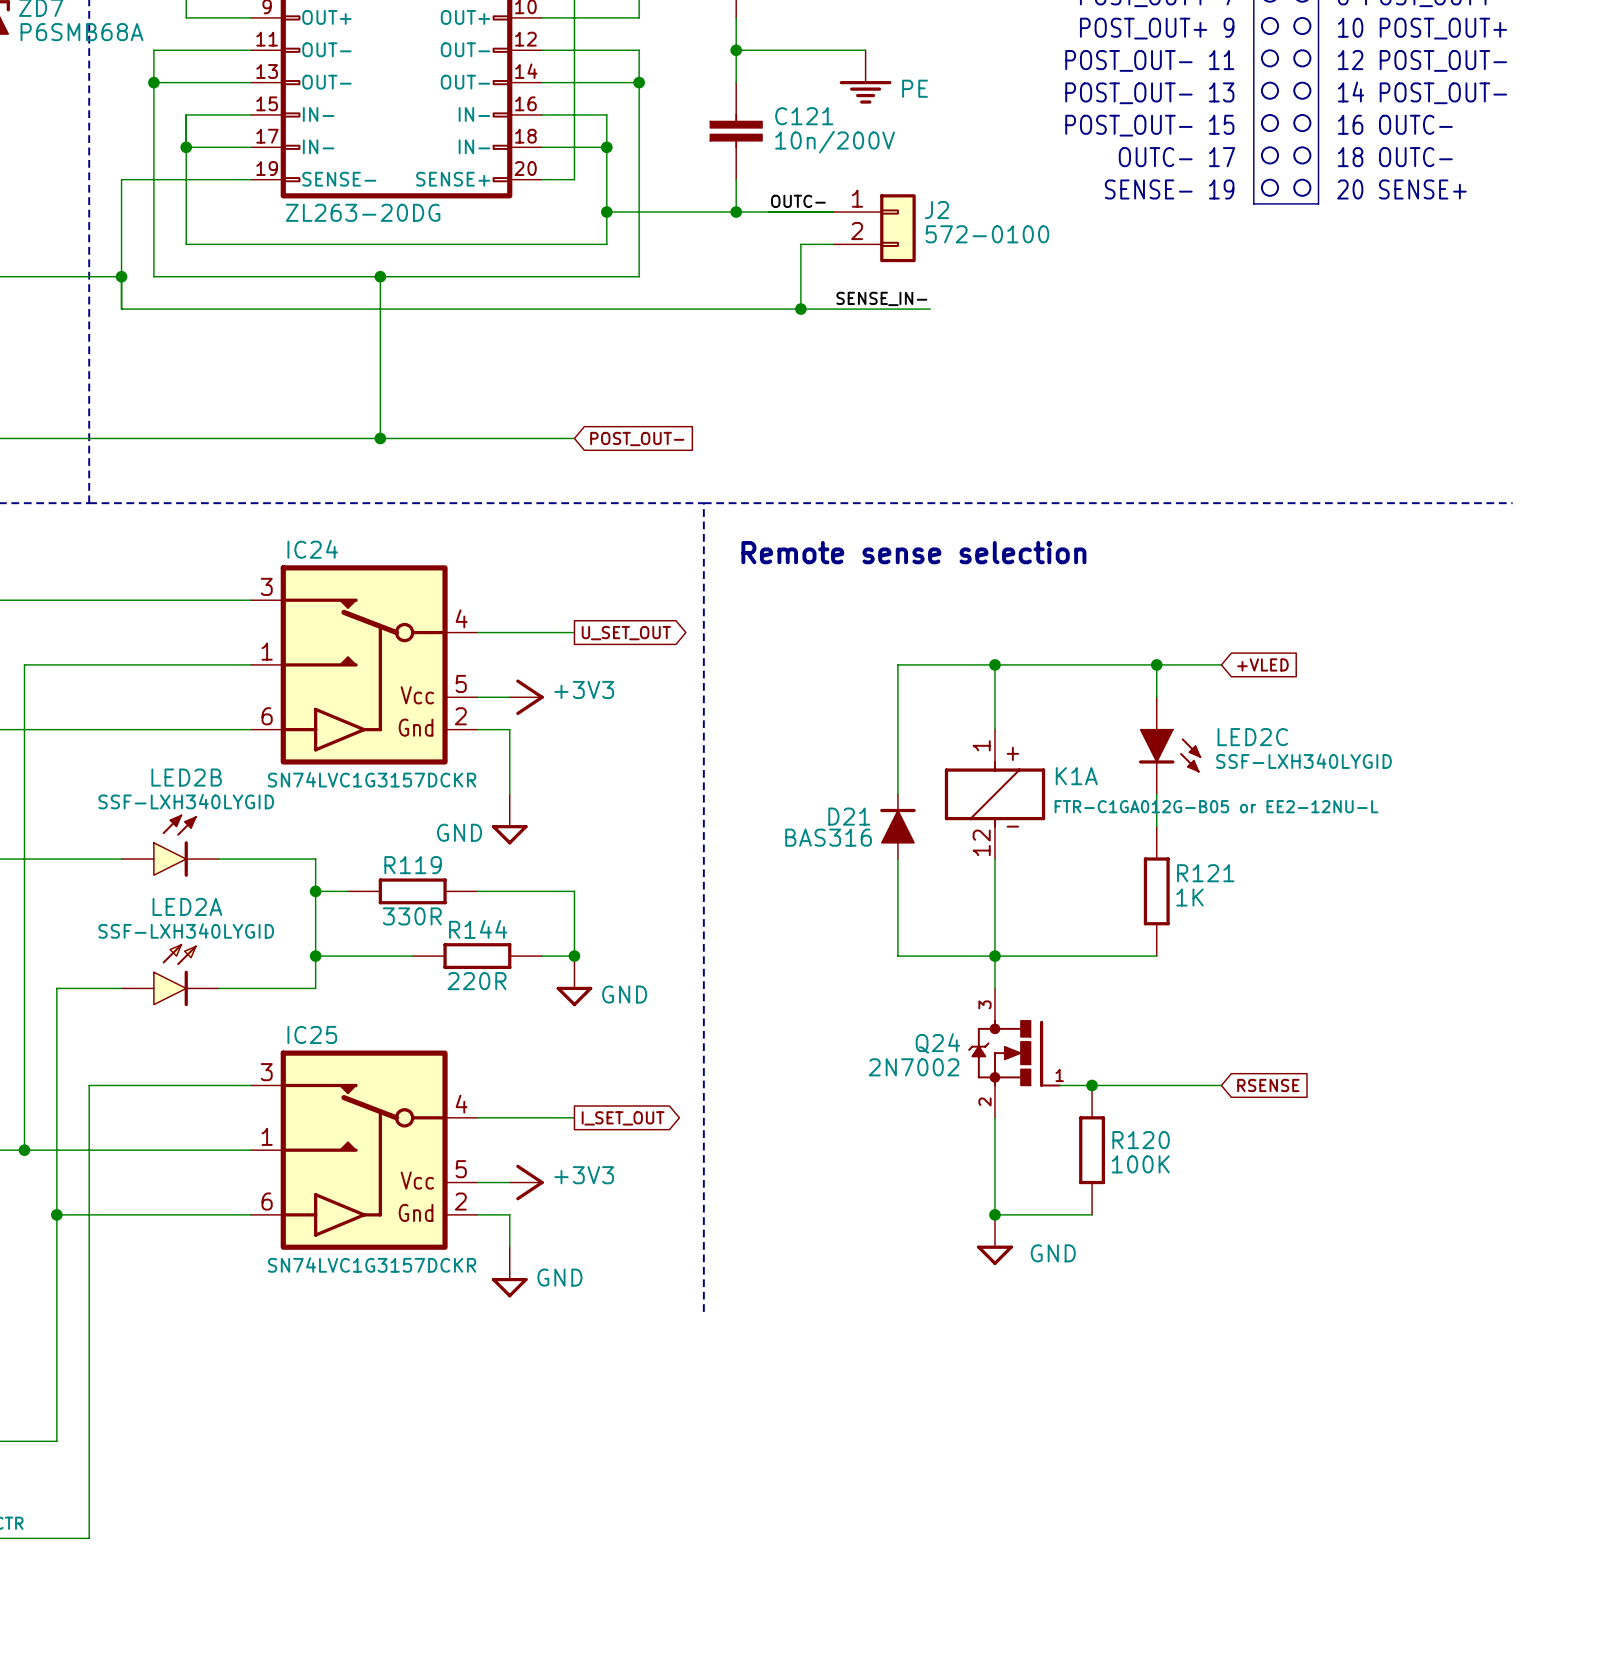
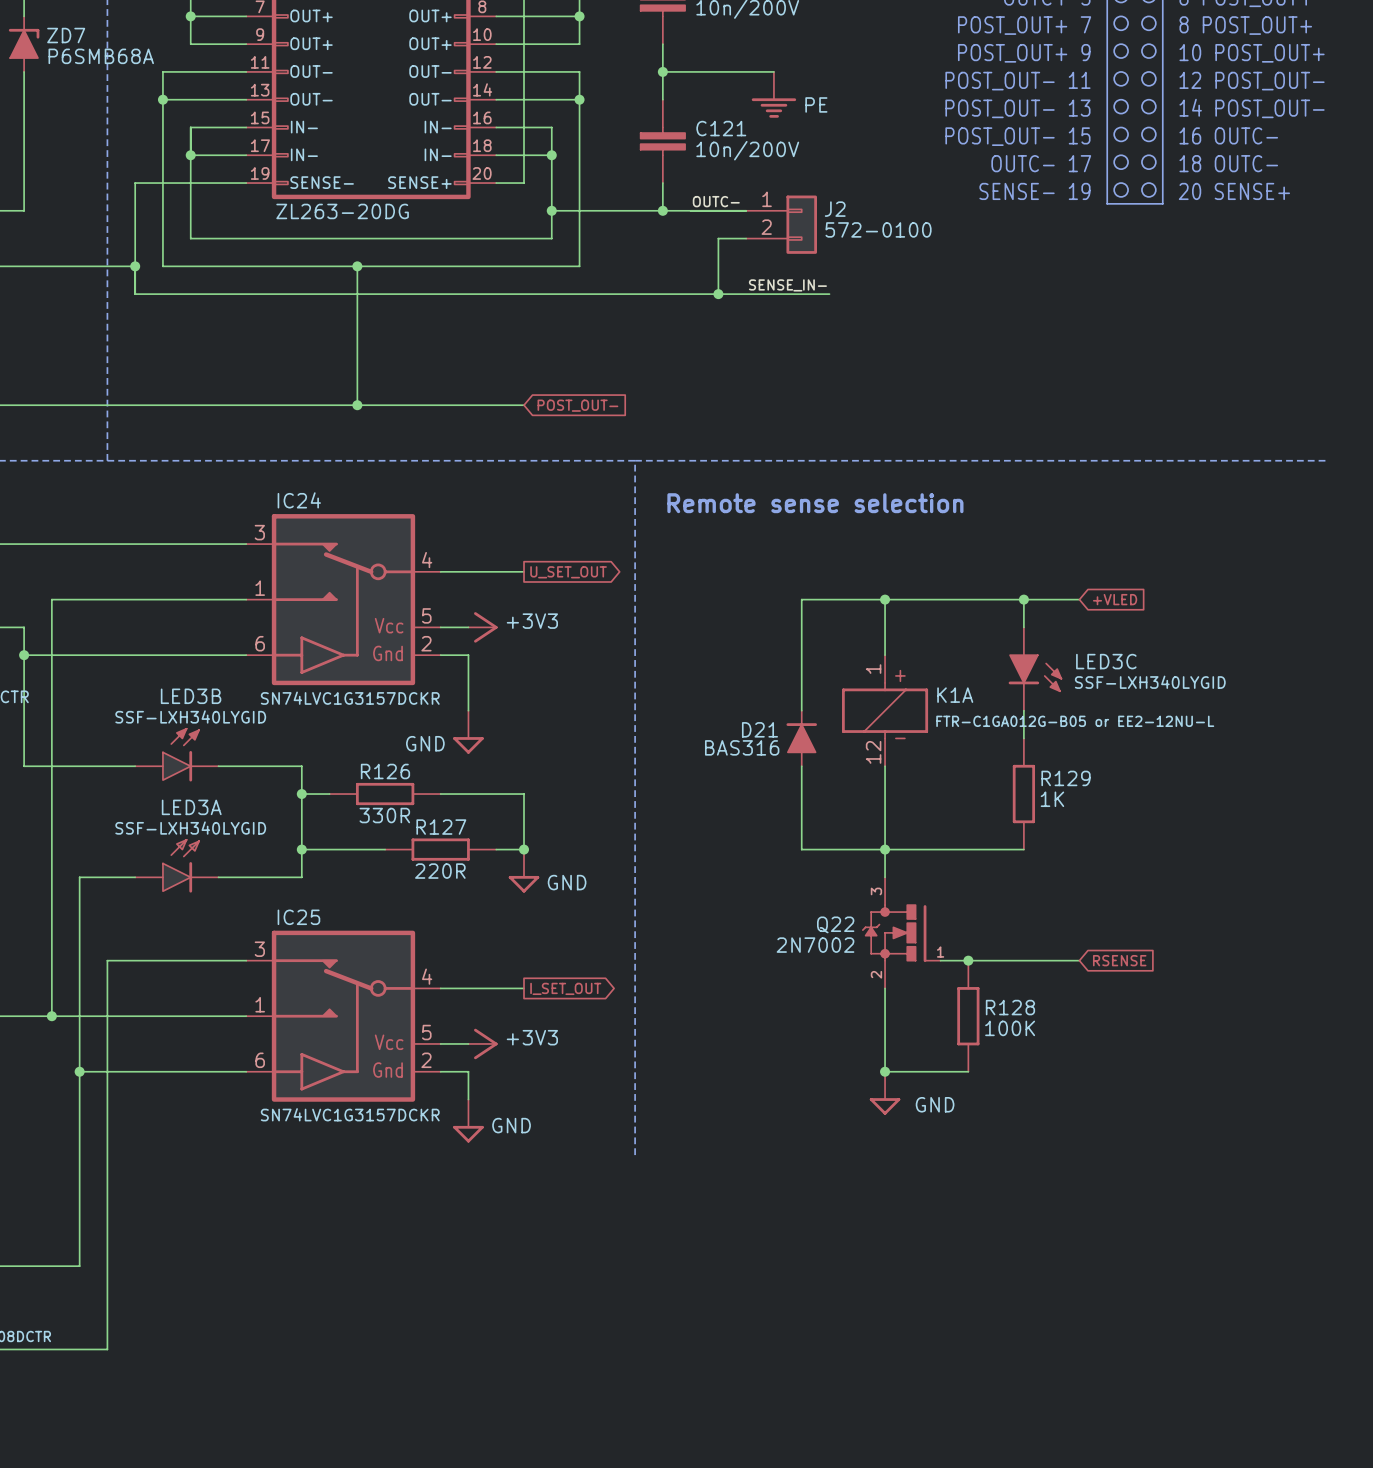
LED2C name: LED2C (1252, 737) -> LED3C (1106, 661)
LED2B name: LED2B (186, 777) -> LED3B (191, 696)
R119 name: R119 (413, 865) -> R126 (385, 771)
R121 name: R121 (1205, 873) -> R129 (1066, 778)
LED2A name: LED2A (187, 906) -> LED3A (191, 807)
R144 name: R144 (478, 929) -> R127 (441, 827)
Q24 name: Q24 (937, 1043) -> Q22 (835, 924)
R120 name: R120 (1141, 1140) -> R128 (1010, 1007)

